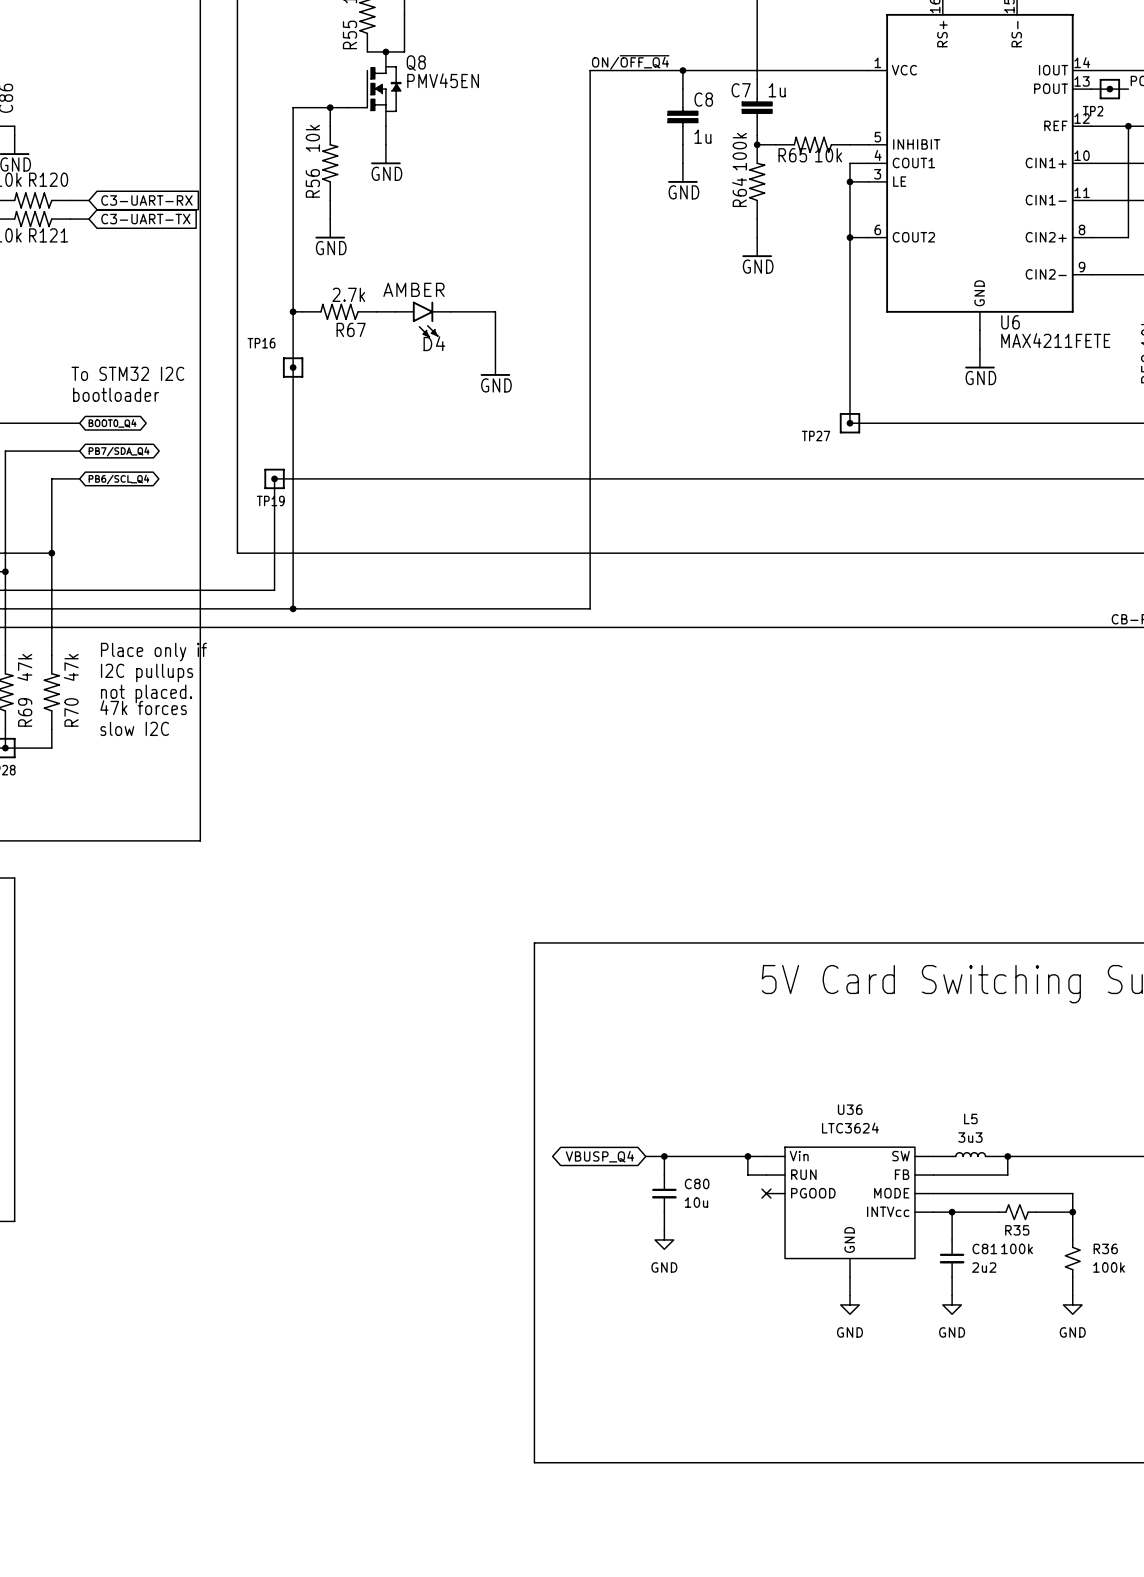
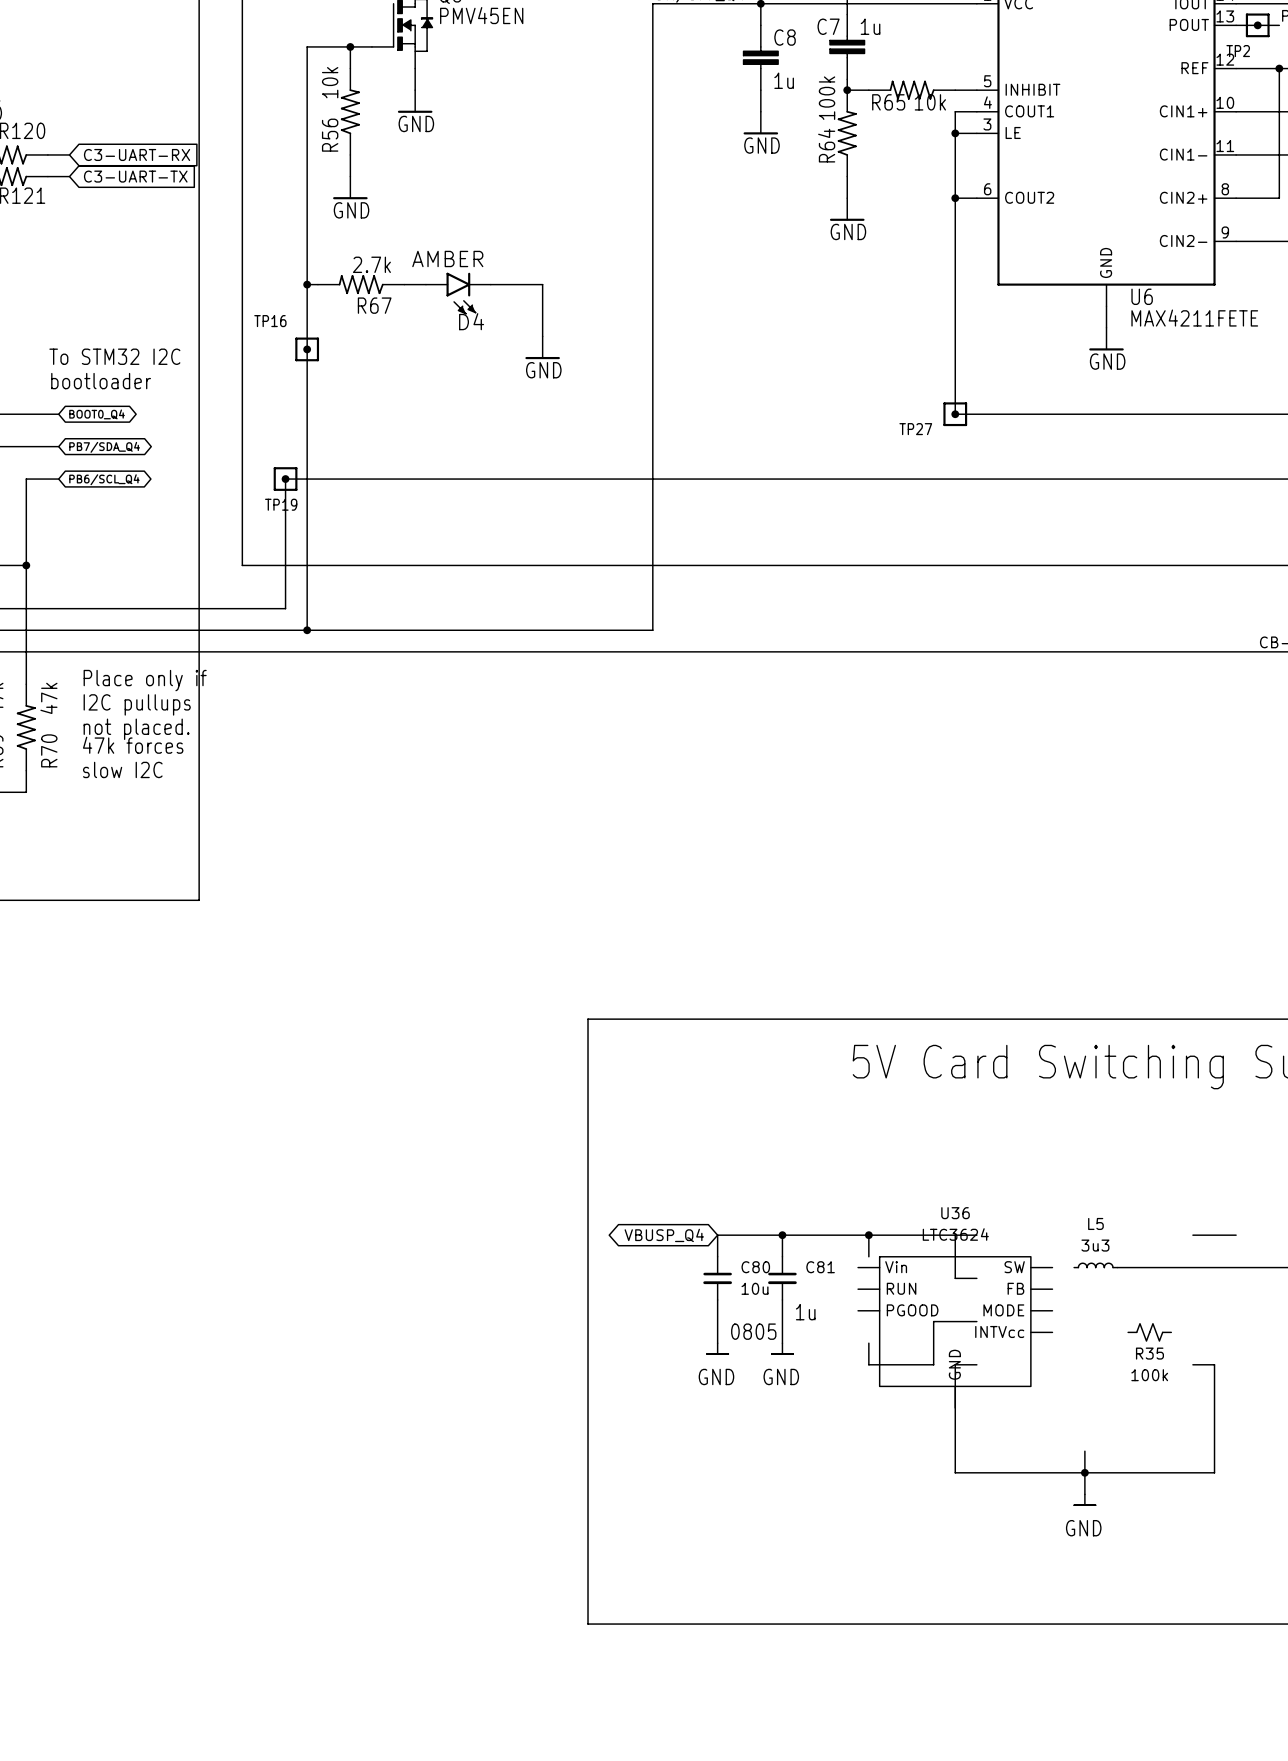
junction: none -> (782, 1235)
junction: none -> (868, 1235)
wire: none -> (955, 1235) (955, 1278) (976, 1278)
wire: none -> (976, 1235) (717, 1235) (717, 1256)
global label position: VBUSP_Q4 (599, 1156) -> VBUSP_Q4 (664, 1235)
wire: (645, 1156) (766, 1156) -> none
wire: (664, 1156) (664, 1175) -> (782, 1235) (782, 1256)
junction: (664, 1156) -> none
wire: (747, 1156) (747, 1175) (766, 1175) -> none
junction: (747, 1156) -> none
wire: (933, 1156) (952, 1156) -> none
wire: (1007, 1156) (1007, 1175) (933, 1175) -> none
junction: (1007, 1156) -> none
wire: none -> (717, 1299) (717, 1343)
wire: none -> (782, 1299) (782, 1343)
C80 position: (664, 1193) -> (717, 1278)
no-connect mark: (766, 1193) -> none
wire: (933, 1193) (1072, 1193) (1072, 1239) -> none
wire: none -> (976, 1321) (933, 1321) (933, 1364) (868, 1364) (868, 1343)
text: none -> 0805 (753, 1331)
wire: (664, 1212) (664, 1230) -> (868, 1235) (868, 1256)
wire: (933, 1212) (998, 1212) -> none
wire: (952, 1212) (952, 1239) -> none
junction: (952, 1212) -> none
wire: (1035, 1212) (1072, 1212) -> (1192, 1235) (1236, 1235)
junction: (1072, 1212) -> none
power symbol: none -> GND (717, 1348)
power symbol: none -> GND (782, 1348)
power symbol: GND (664, 1239) -> none
wire: none -> (976, 1364) (955, 1364) (955, 1408)
wire: none -> (1192, 1364) (1214, 1364) (1214, 1408)
C81 position: (952, 1258) -> (782, 1278)
R36: 100k (1072, 1258) -> none
C81 value: 2u2 (984, 1267) -> 1u (805, 1312)
wire: (952, 1277) (952, 1295) -> none
wire: none -> (955, 1429) (955, 1472) (1214, 1472) (1214, 1429)
power symbol: GND (849, 1304) -> none
power symbol: GND (952, 1304) -> none
power symbol: GND (1072, 1304) -> none
wire: none -> (1084, 1451) (1084, 1494)
junction: none -> (1084, 1472)
power symbol: none -> GND (1084, 1499)

